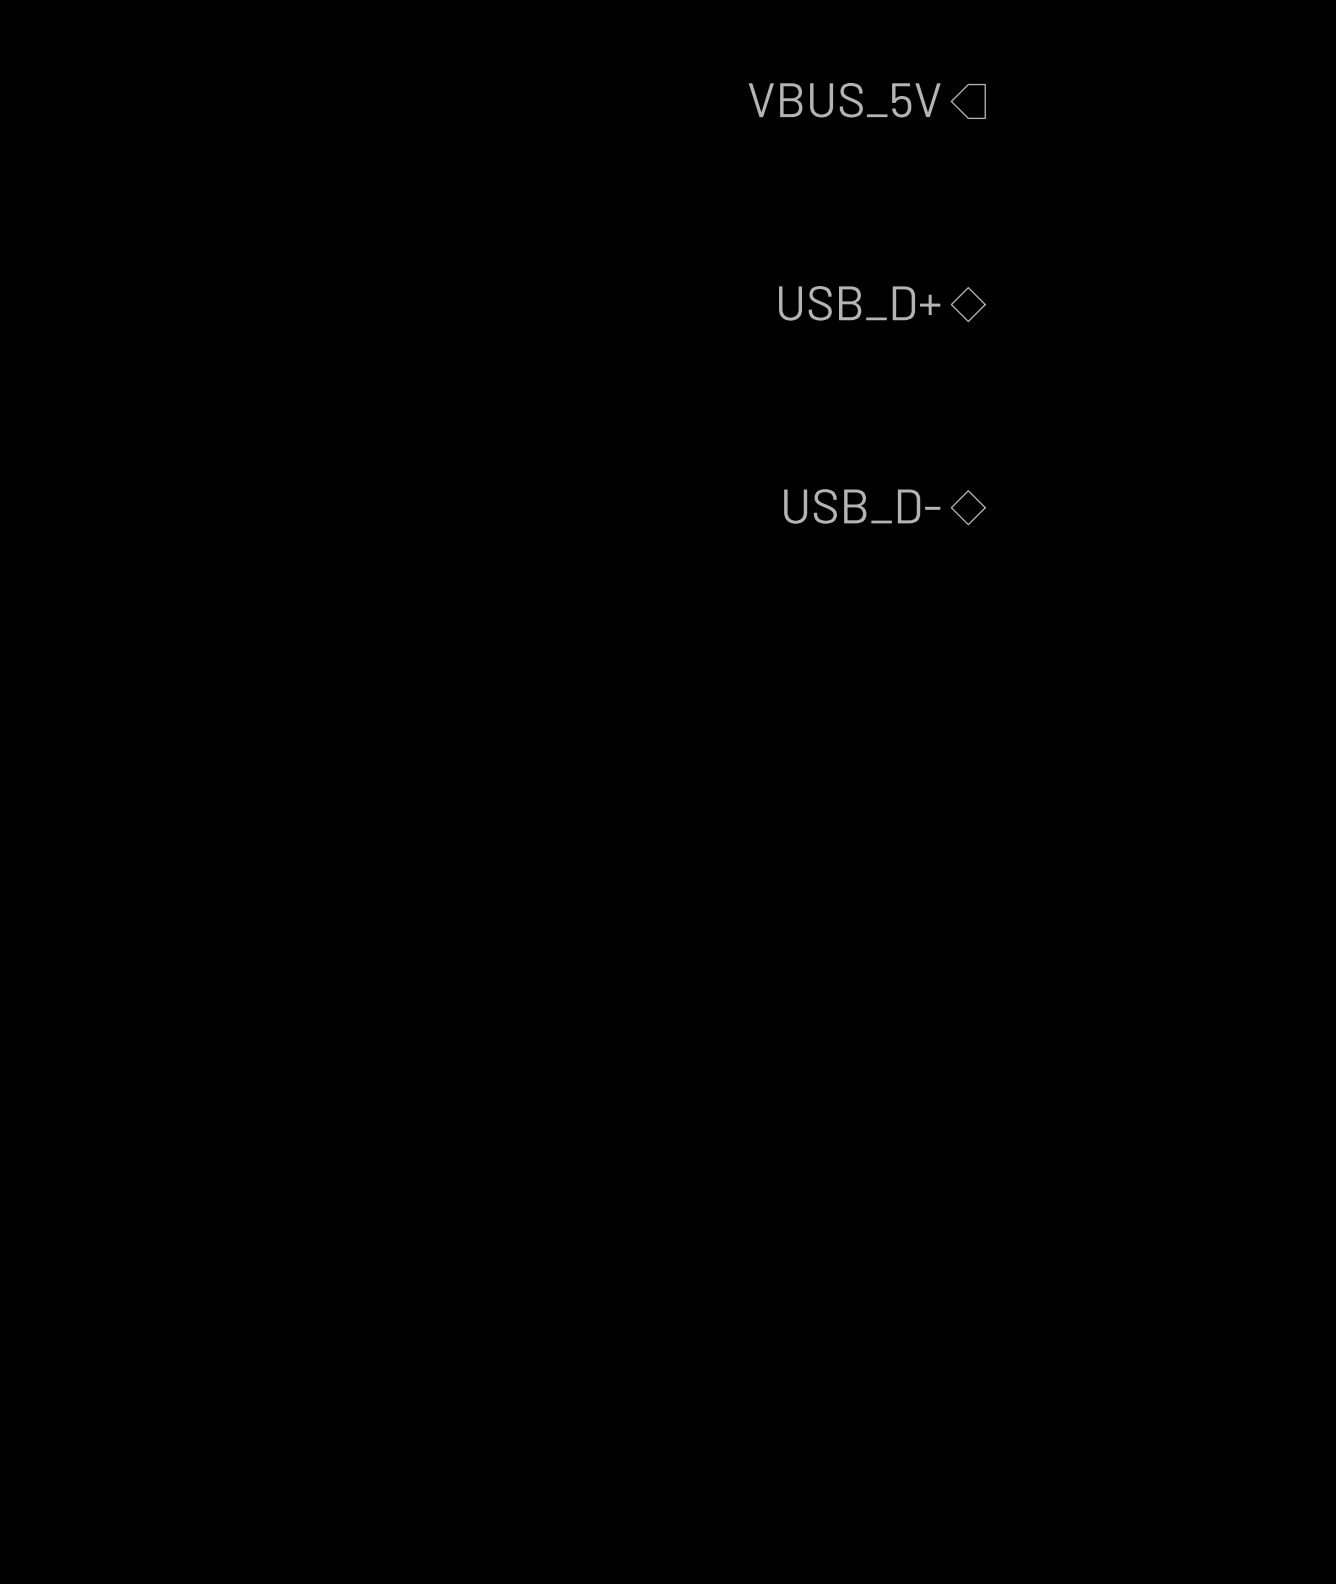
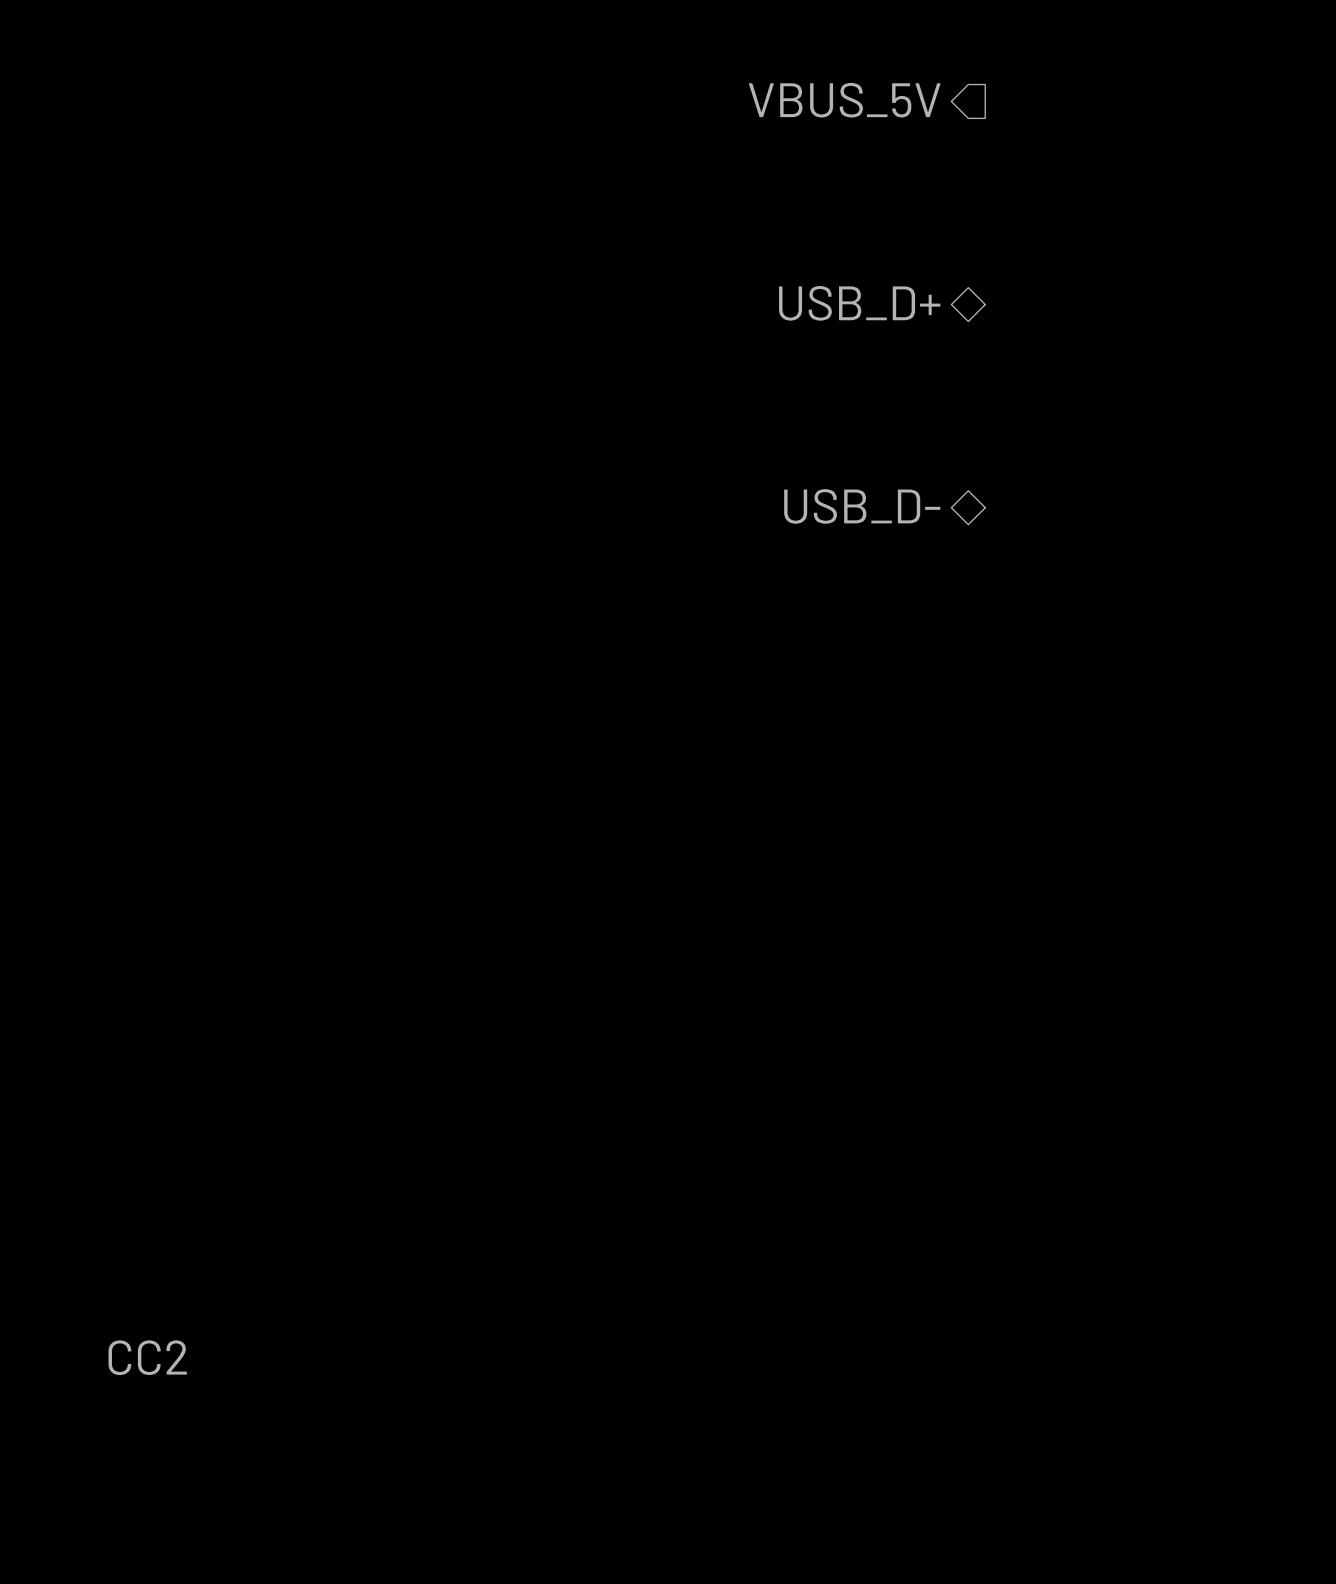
label: none -> CC2 (147, 1357)

